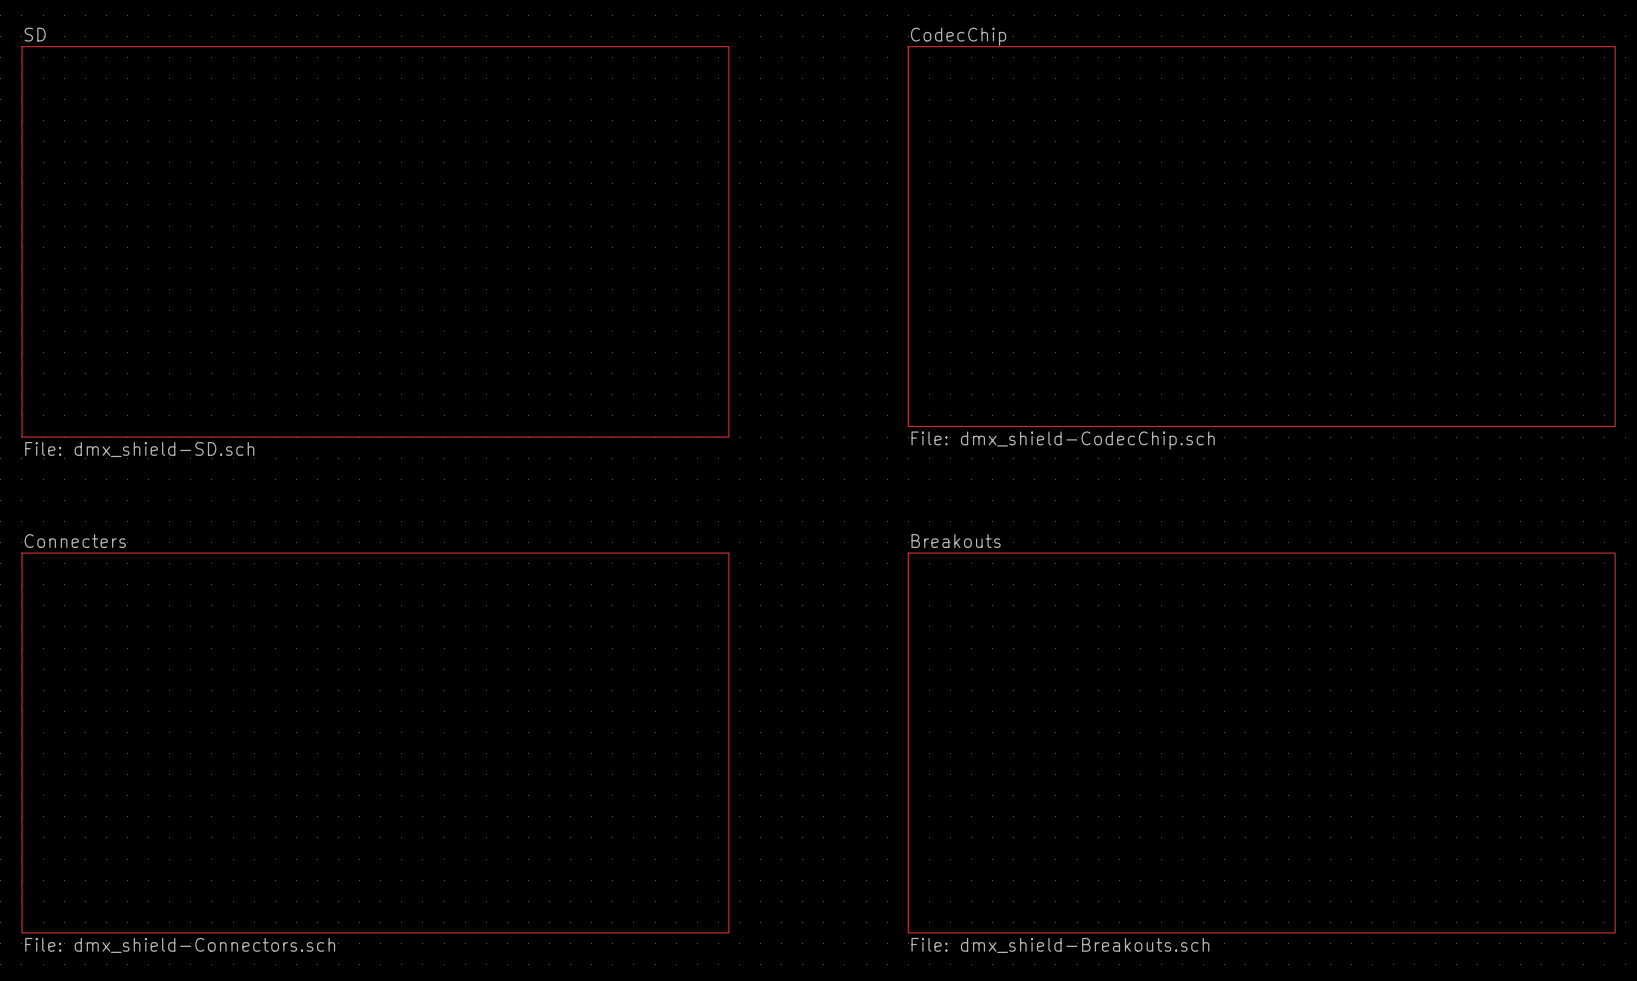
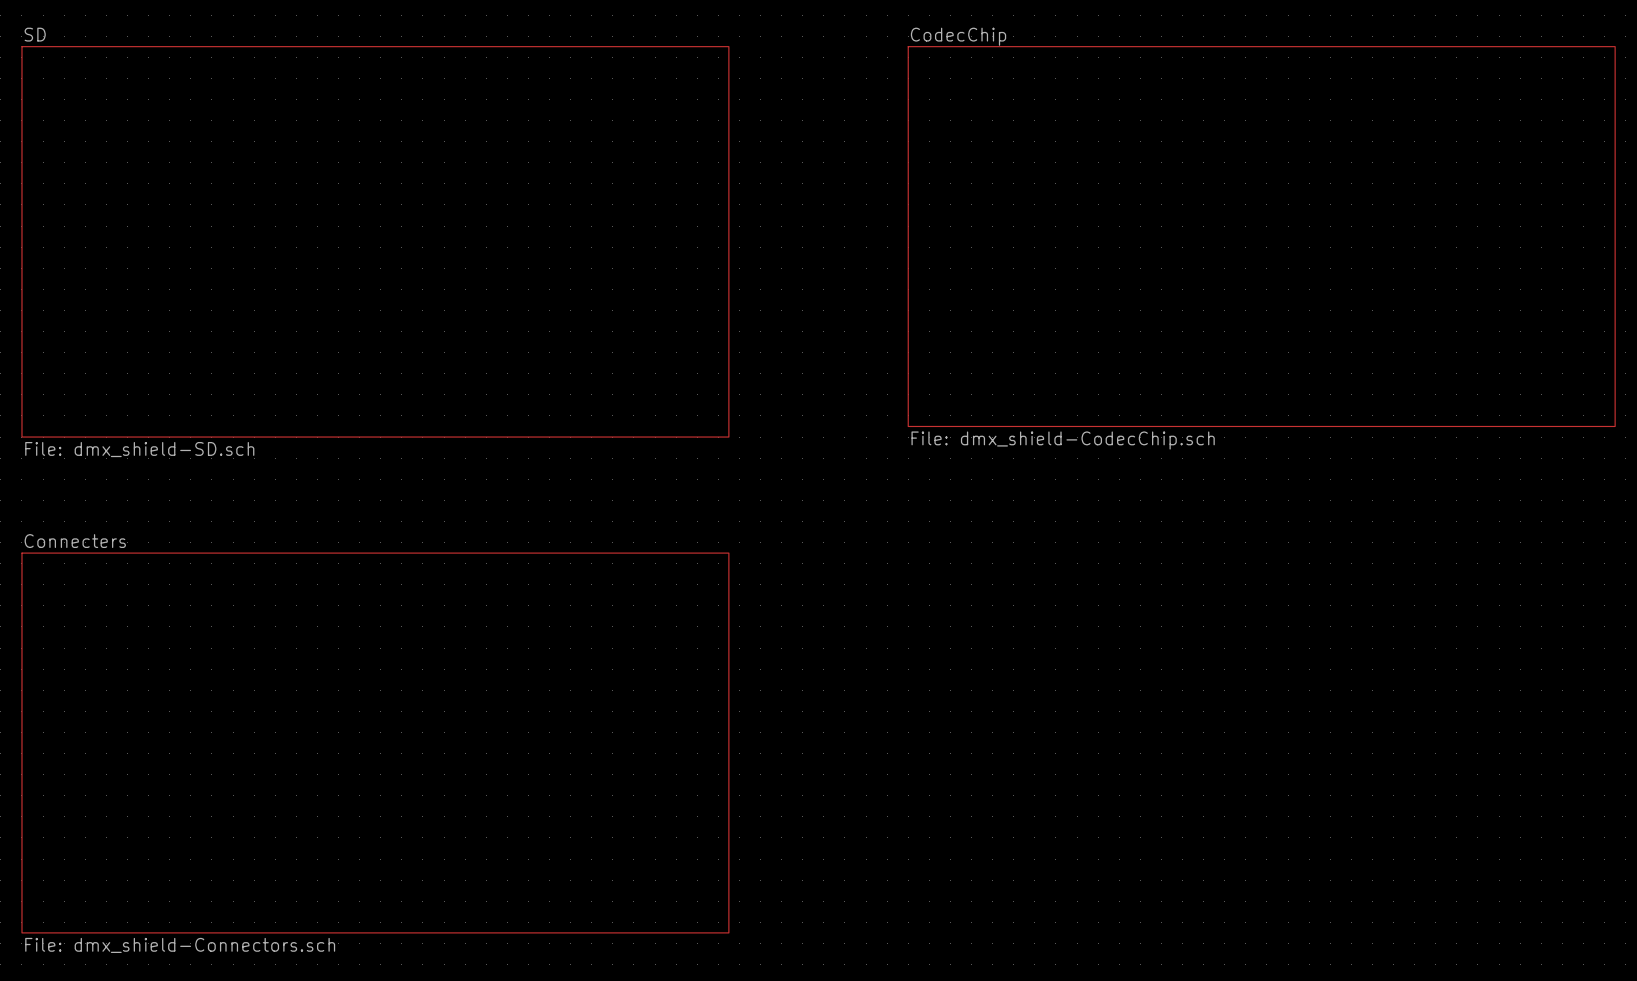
sheet Breakouts: File: dmx_shield-Breakouts.sch (1261, 742) -> none

